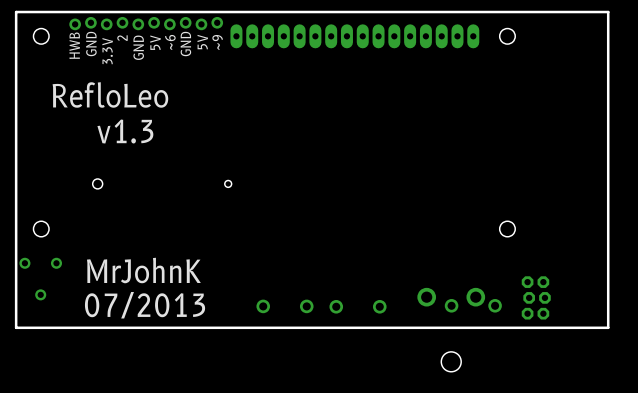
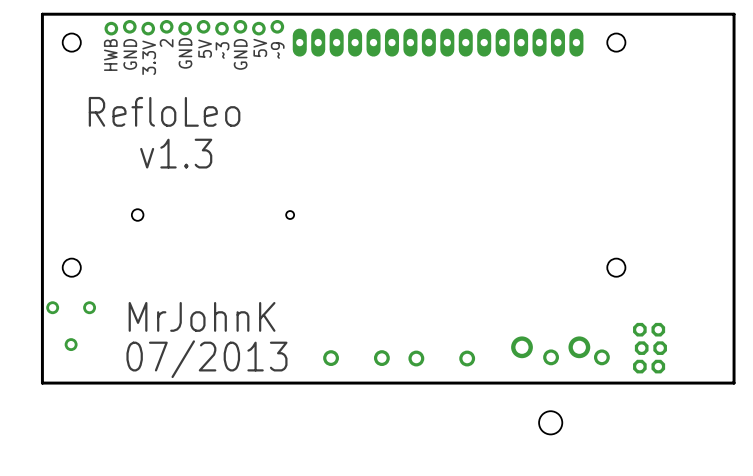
text: ~6 (170, 42) -> ~3 (222, 50)

